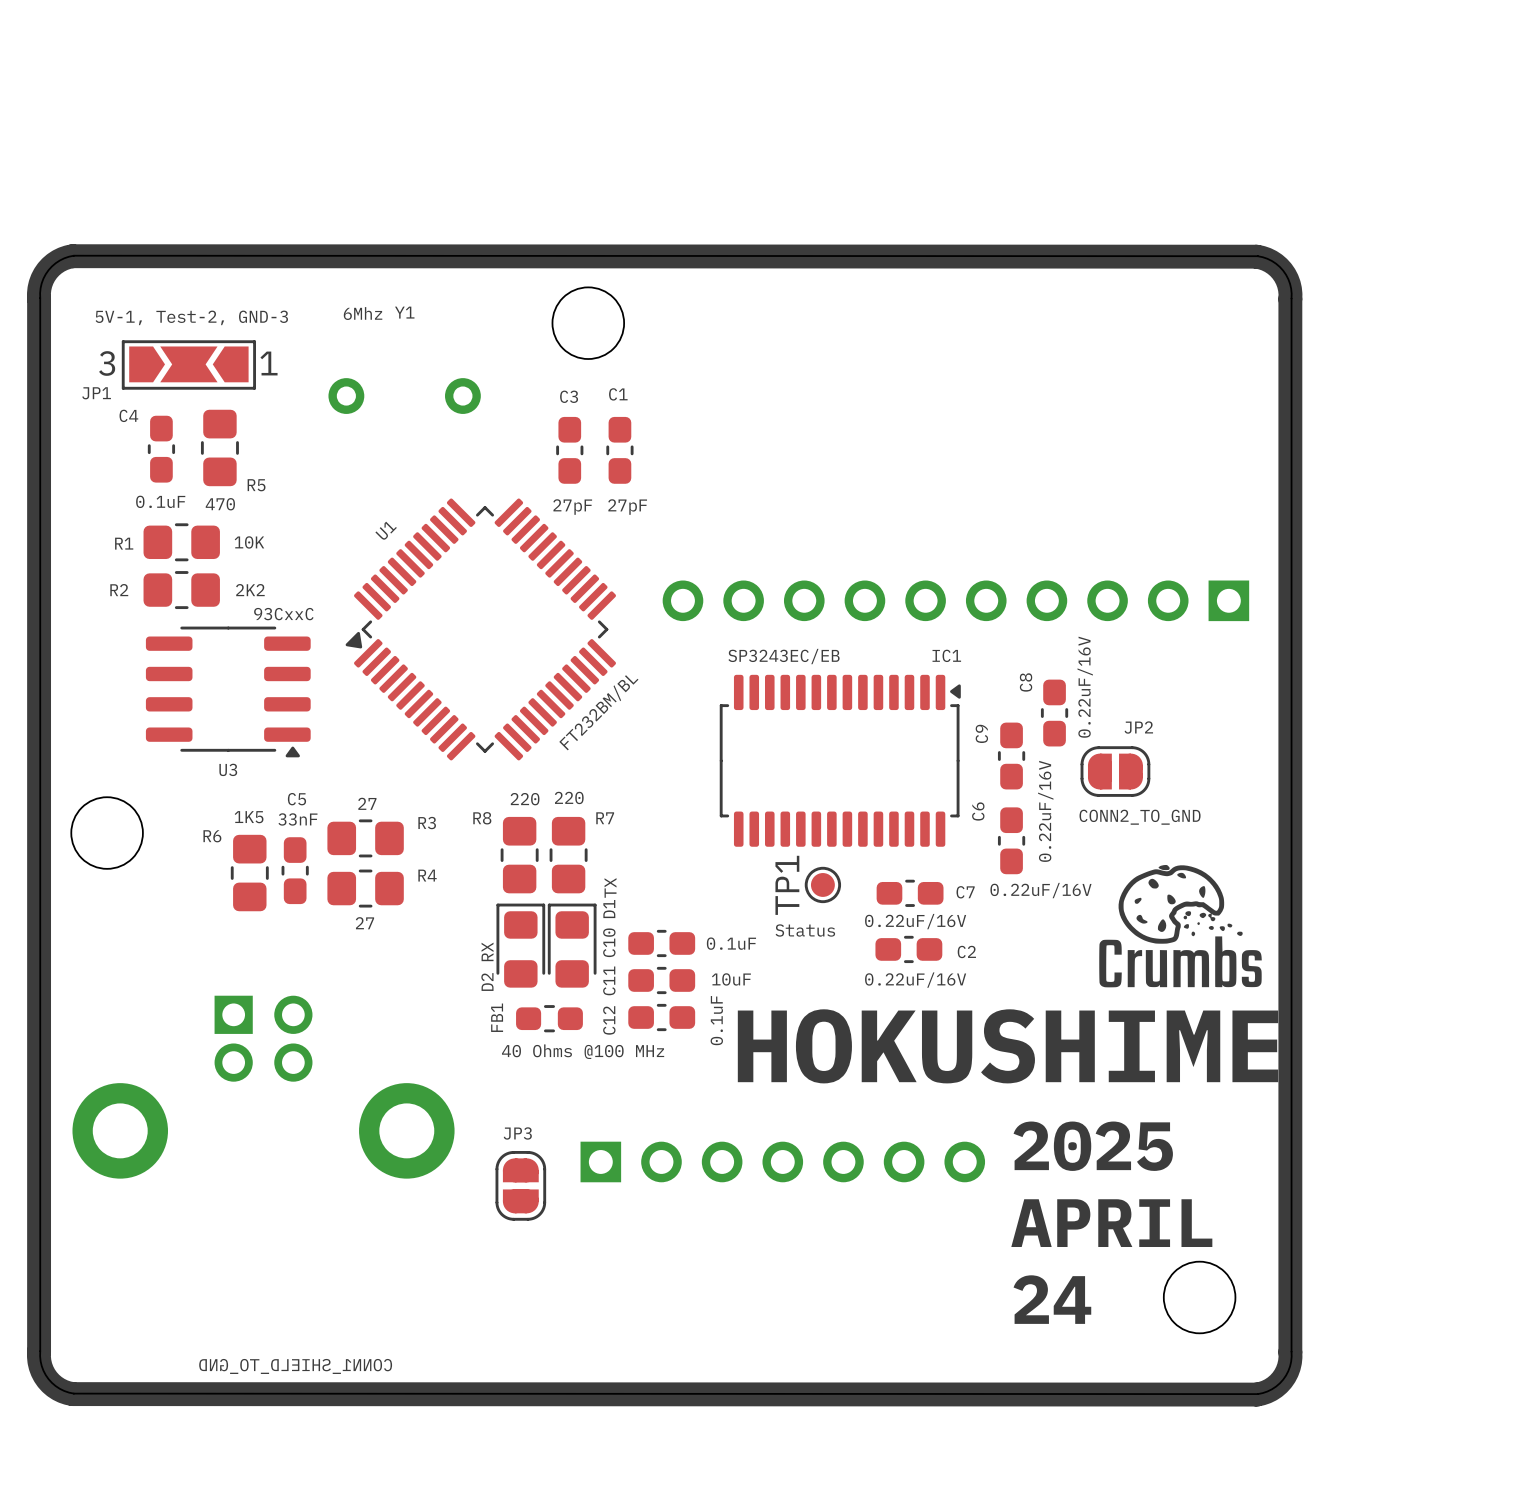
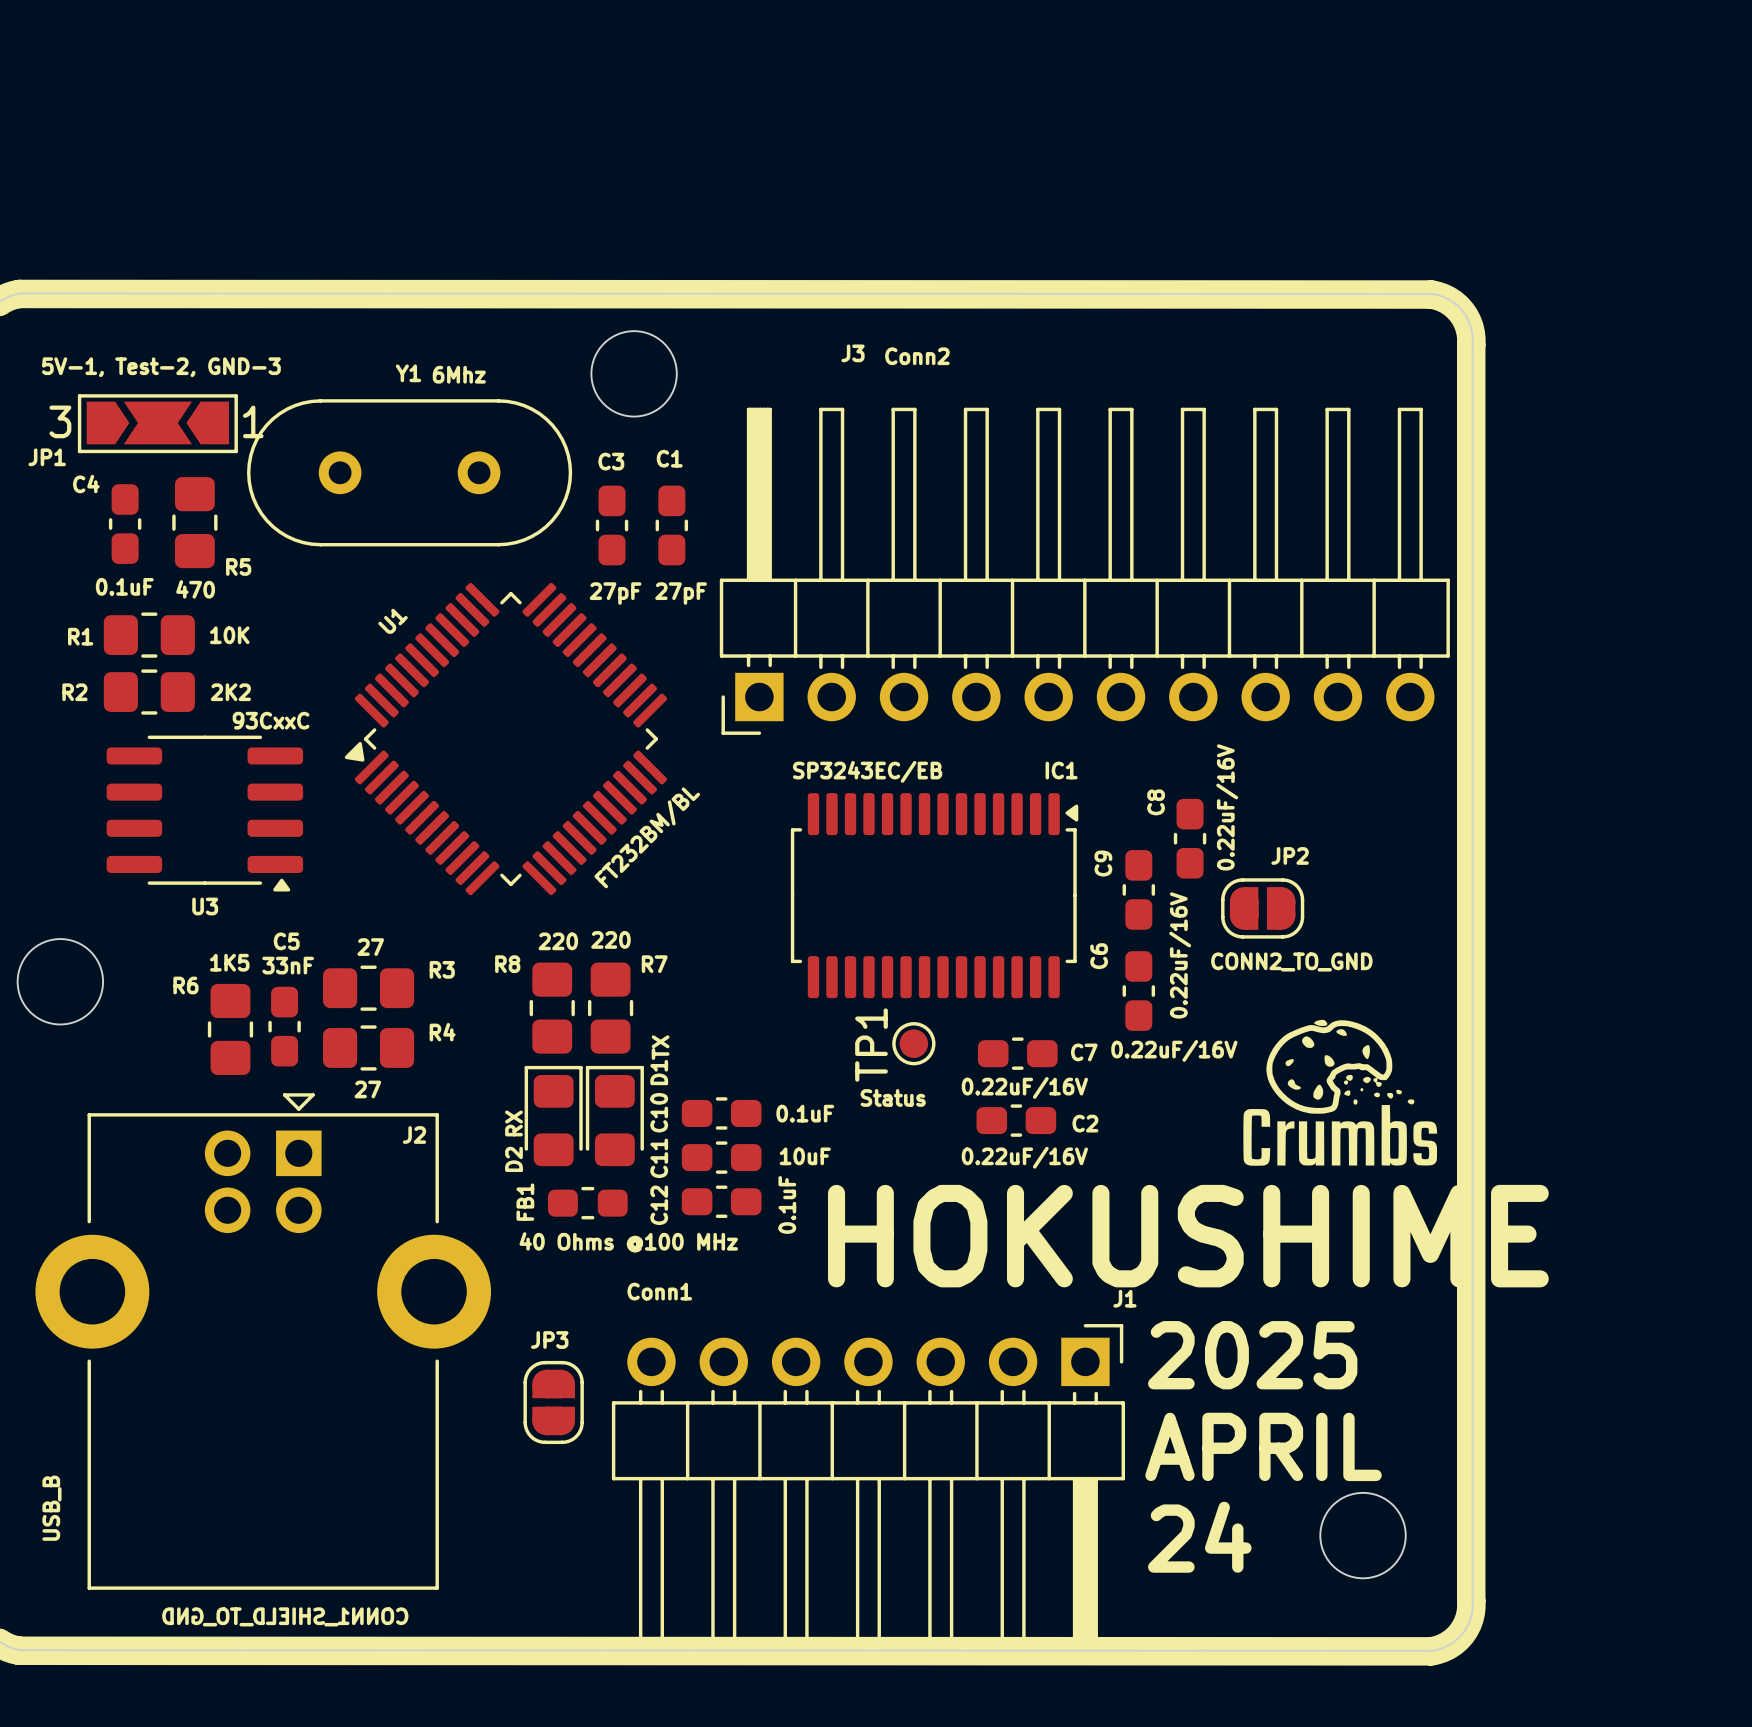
Y1 side: bottom (404, 396) -> top (409, 472)
J3: none -> Conn2 (1084, 571)
part: (955, 600) -> none
J2 side: bottom (263, 1087) -> top (263, 1341)
part: (782, 1161) -> none
J1: none -> Conn1 (868, 1487)

